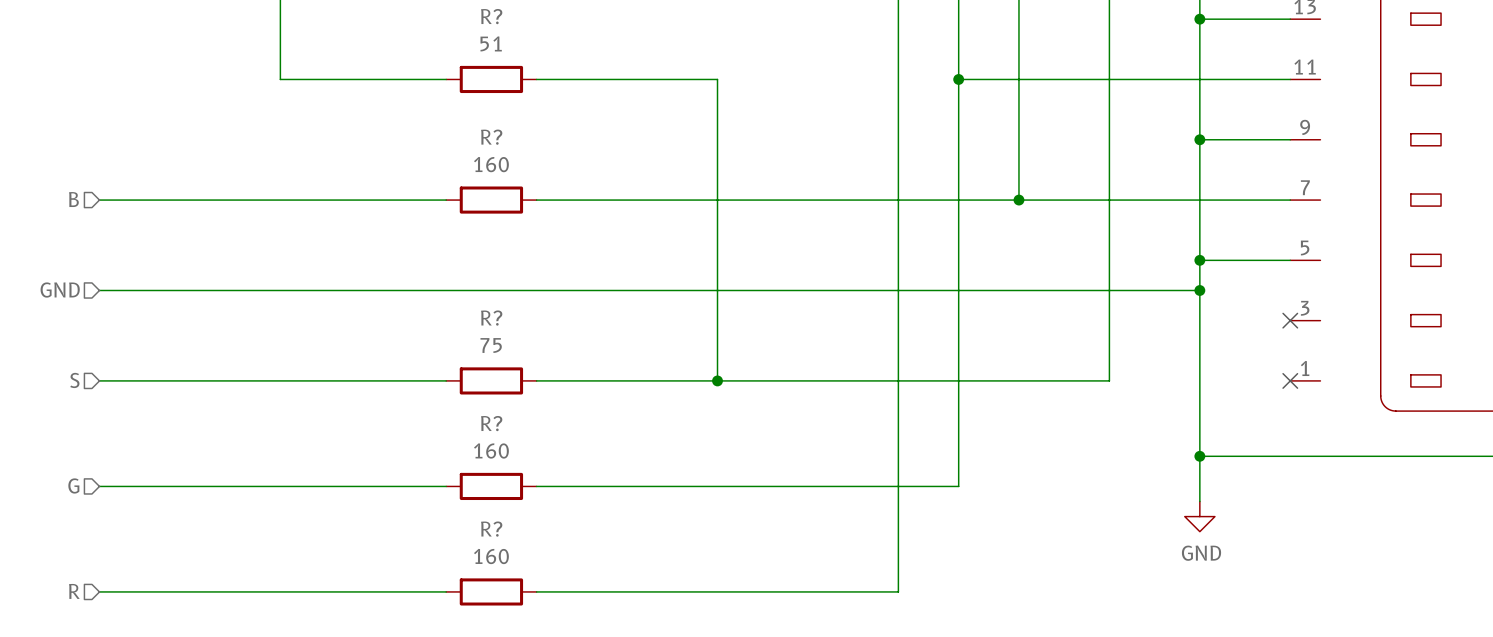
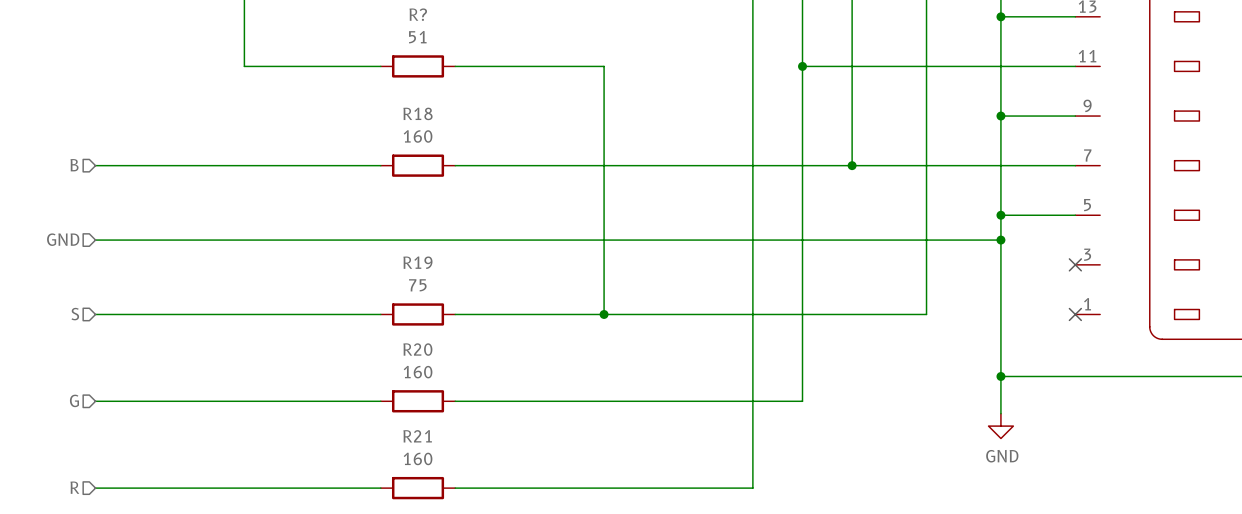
R? name: R? (491, 137) -> R18 (417, 113)
R? name: R? (491, 318) -> R19 (417, 262)
R? name: R? (491, 423) -> R20 (417, 349)
R? name: R? (491, 529) -> R21 (417, 436)

